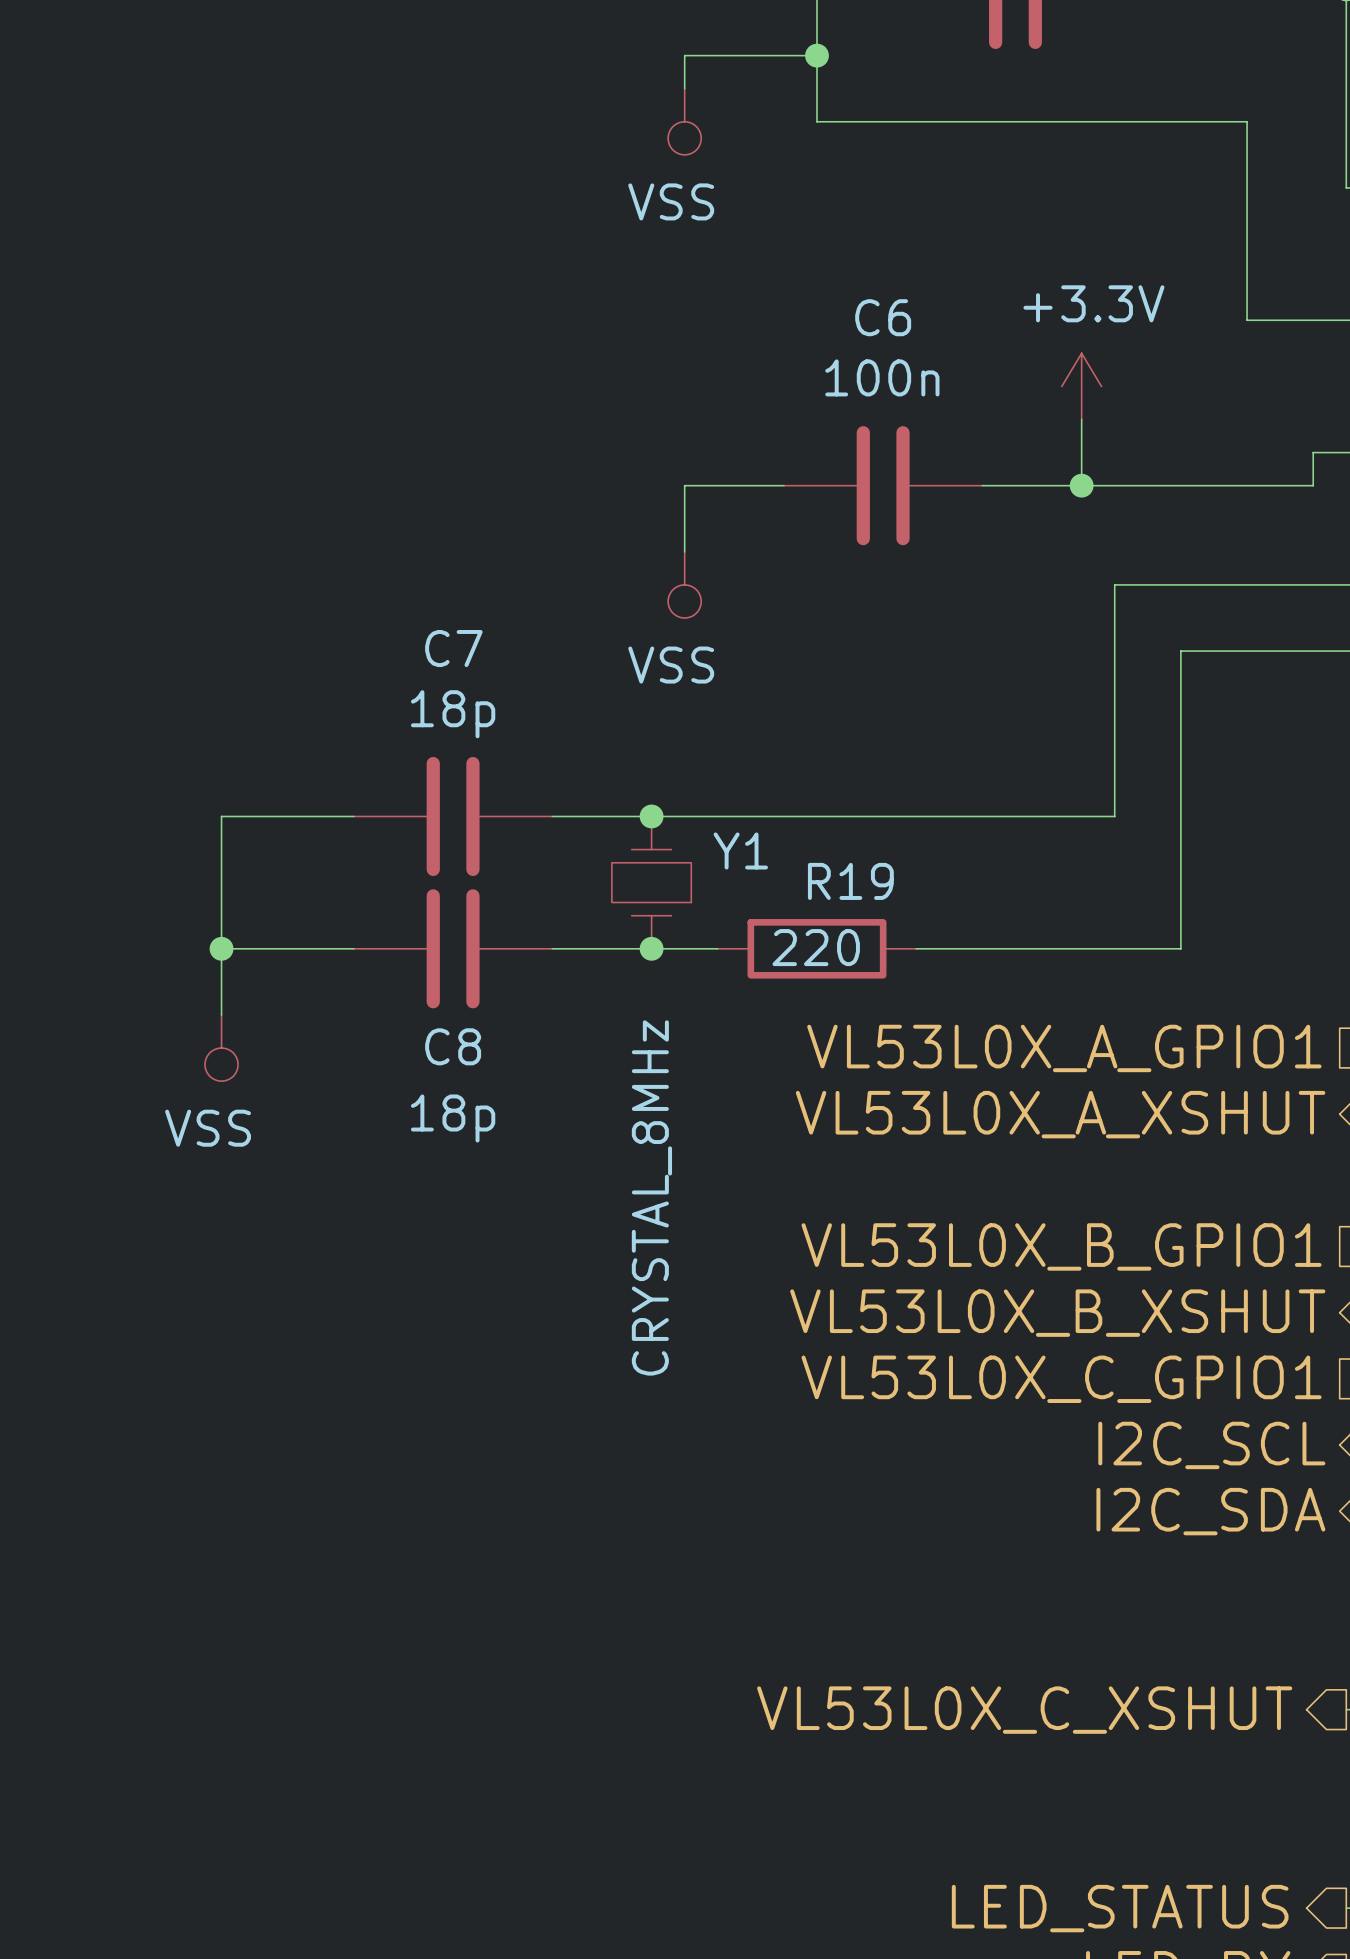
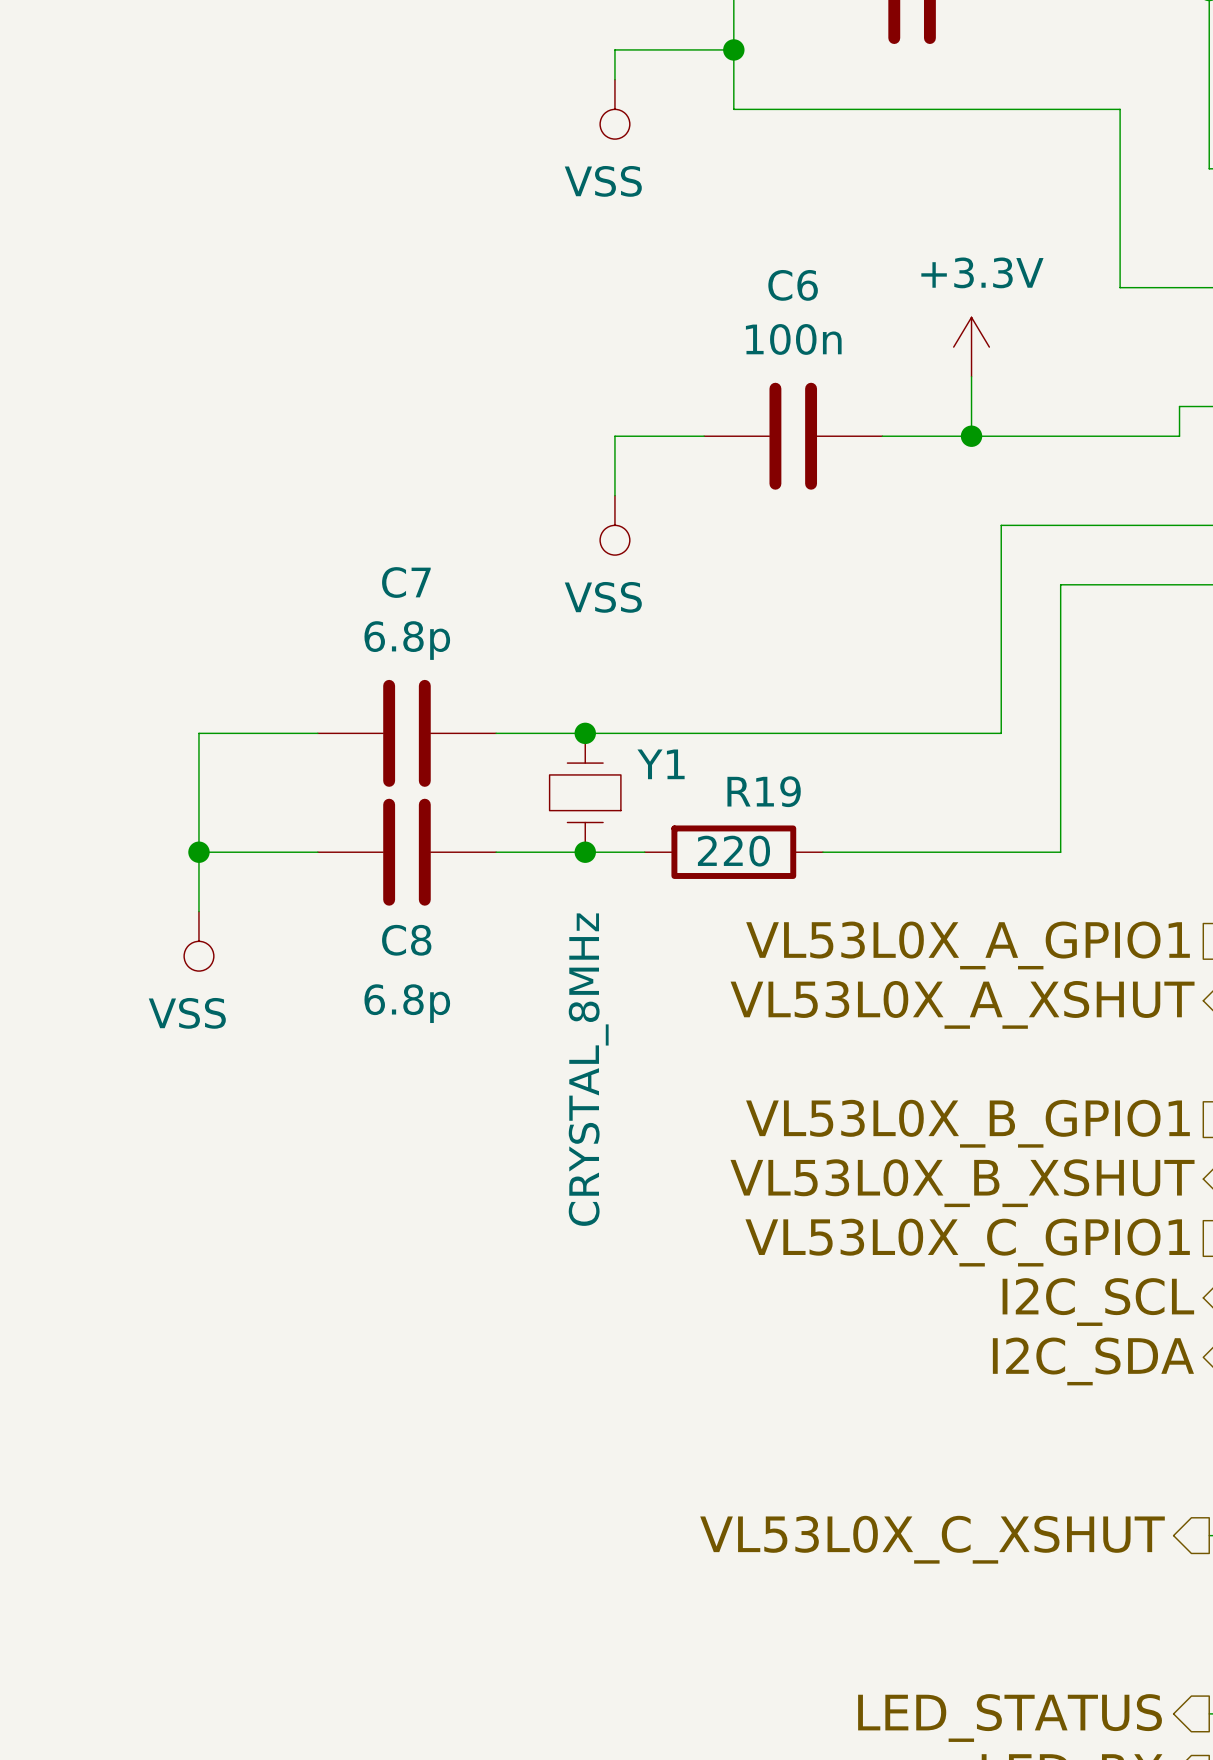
C7 value: 18p (453, 714) -> 6.8p (407, 640)
C8 value: 18p (453, 1118) -> 6.8p (407, 1003)

